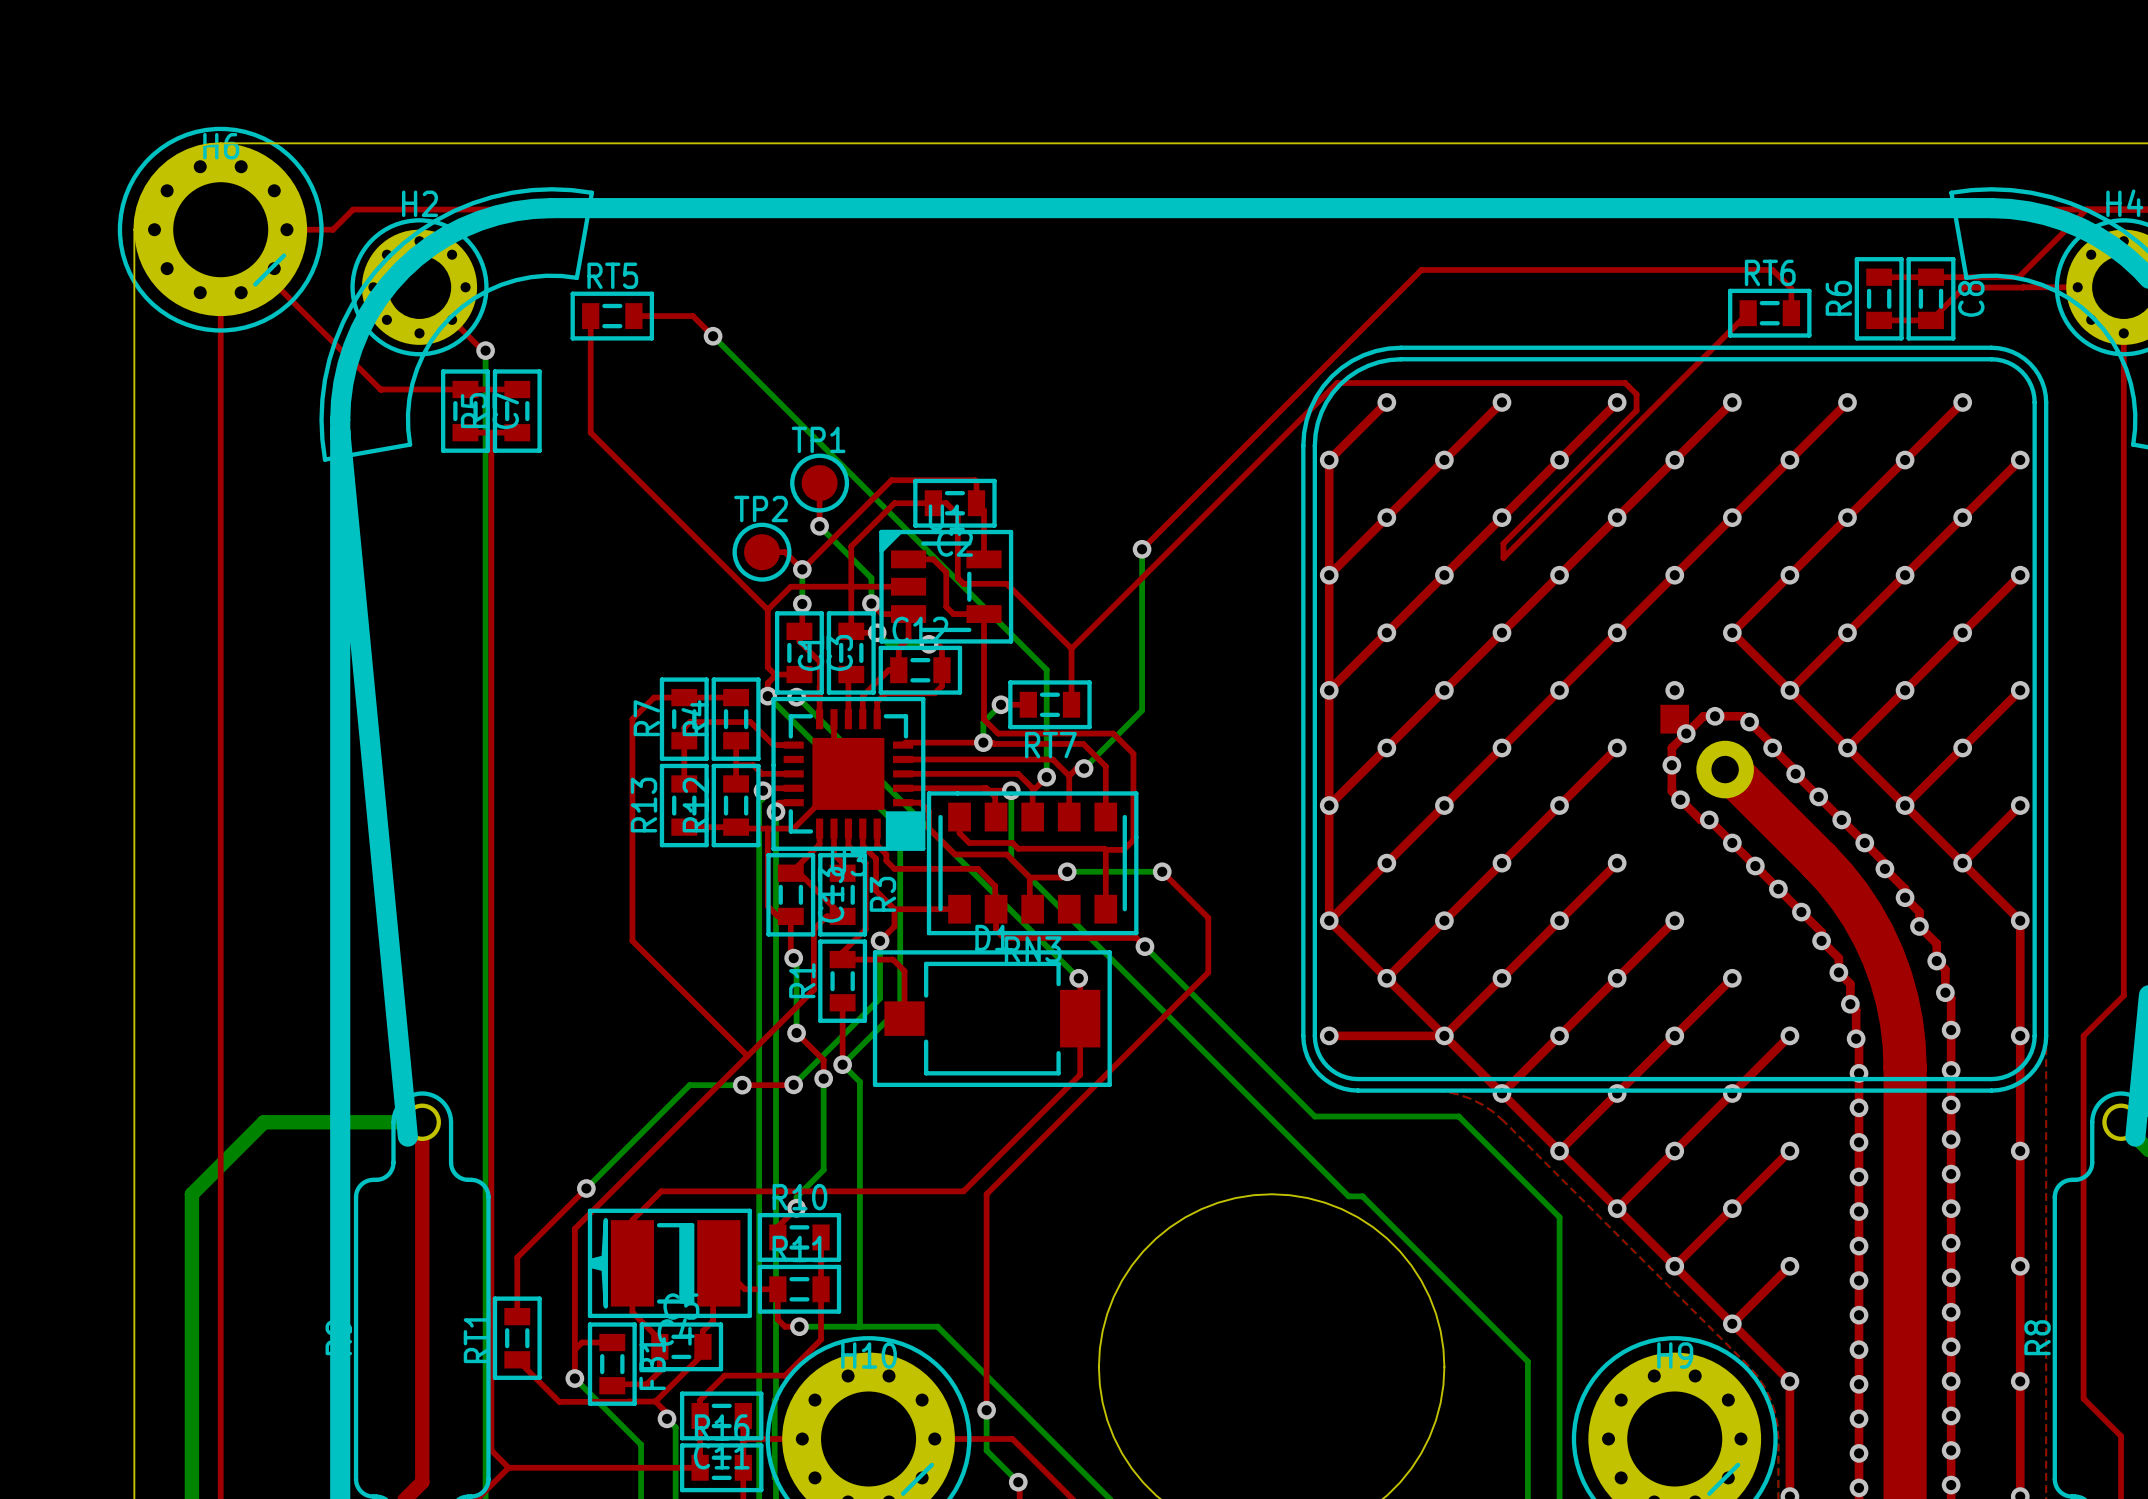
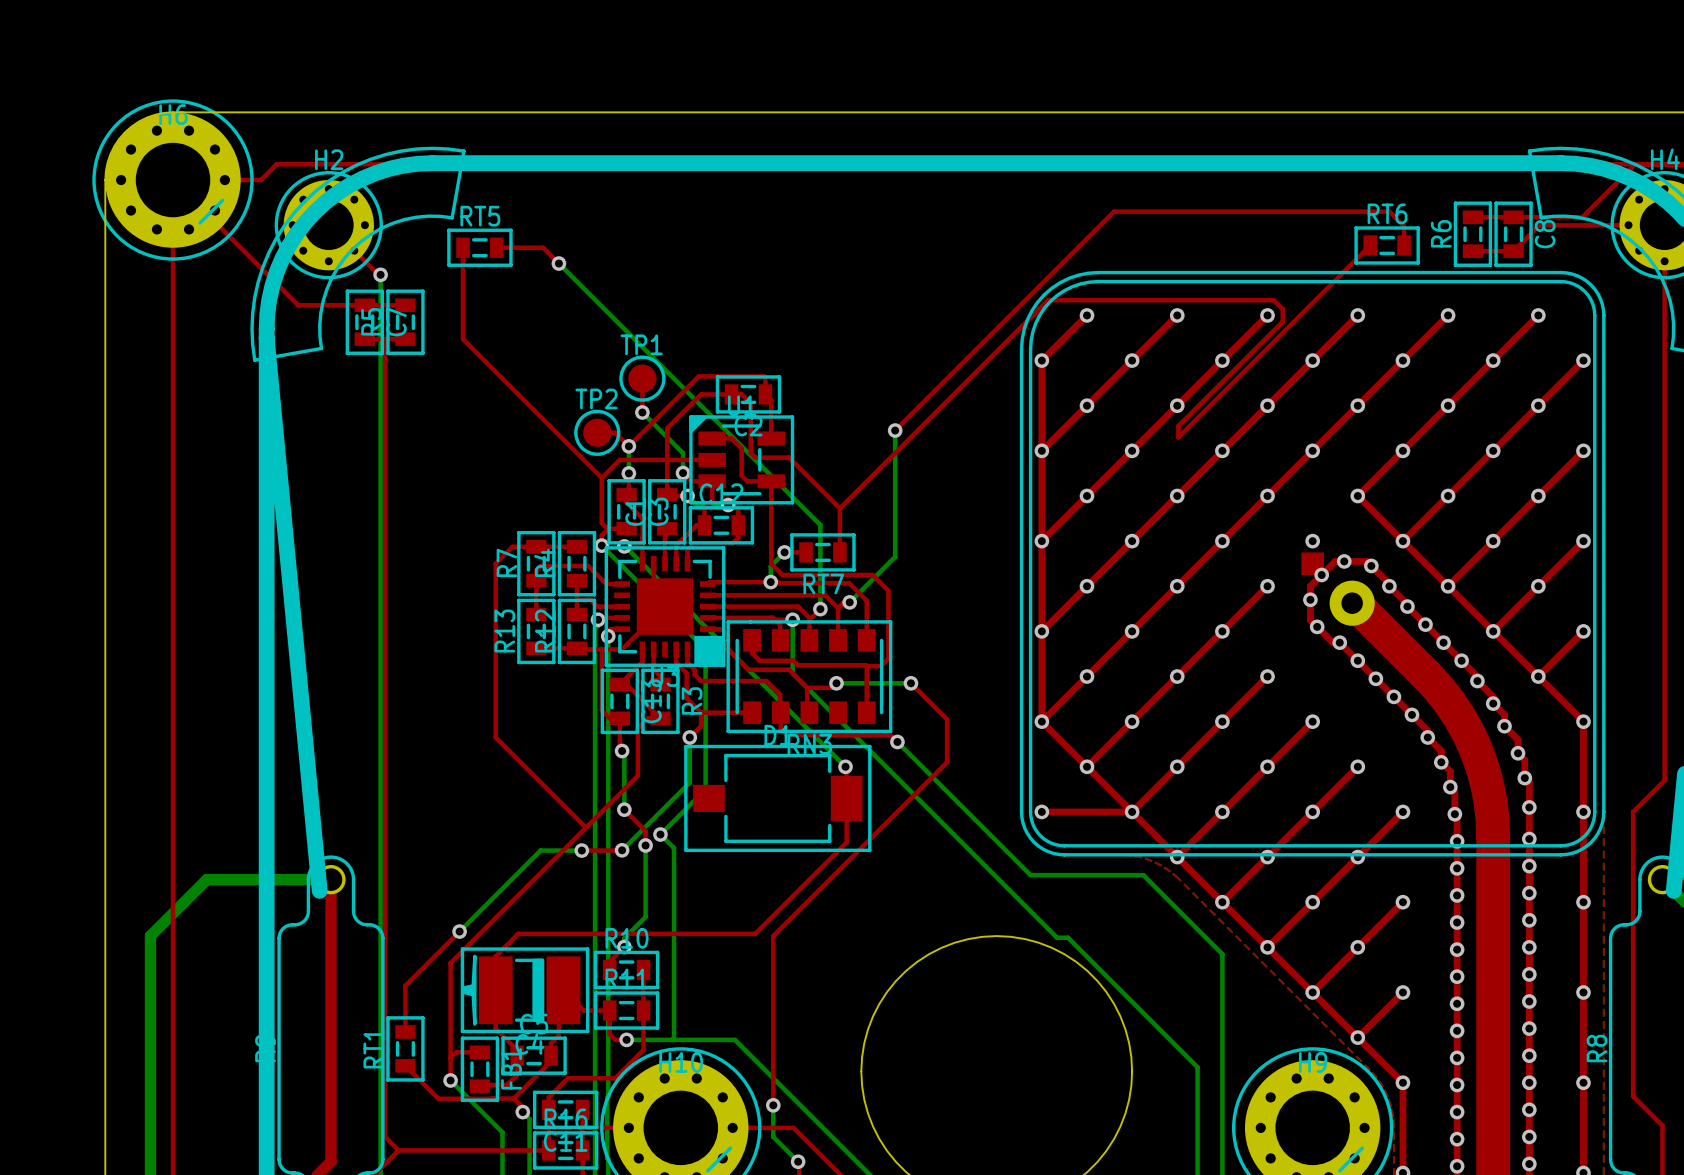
top track: (848, 828) (848, 845) (865, 863) (865, 929) (842, 952) (842, 959) (893, 959) (904, 971) (904, 1018) -> none
R1: (842, 981) -> none
top track: (842, 1002) (842, 1064) -> none

